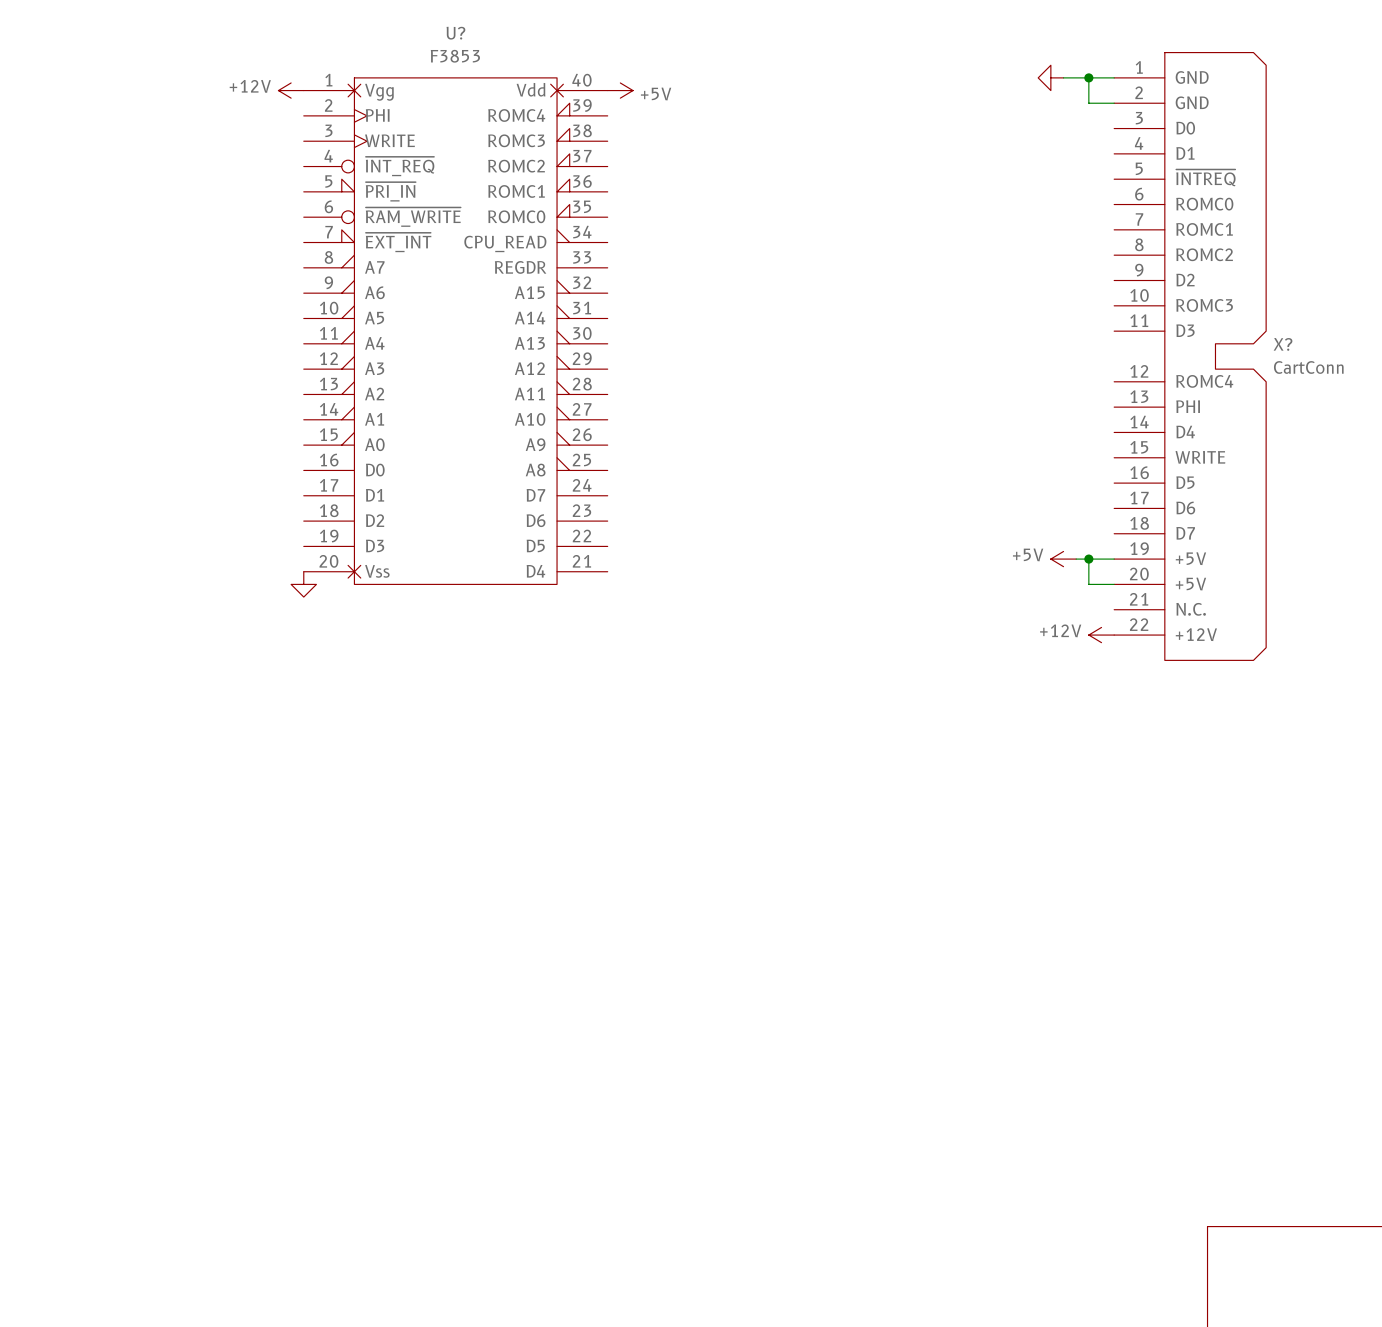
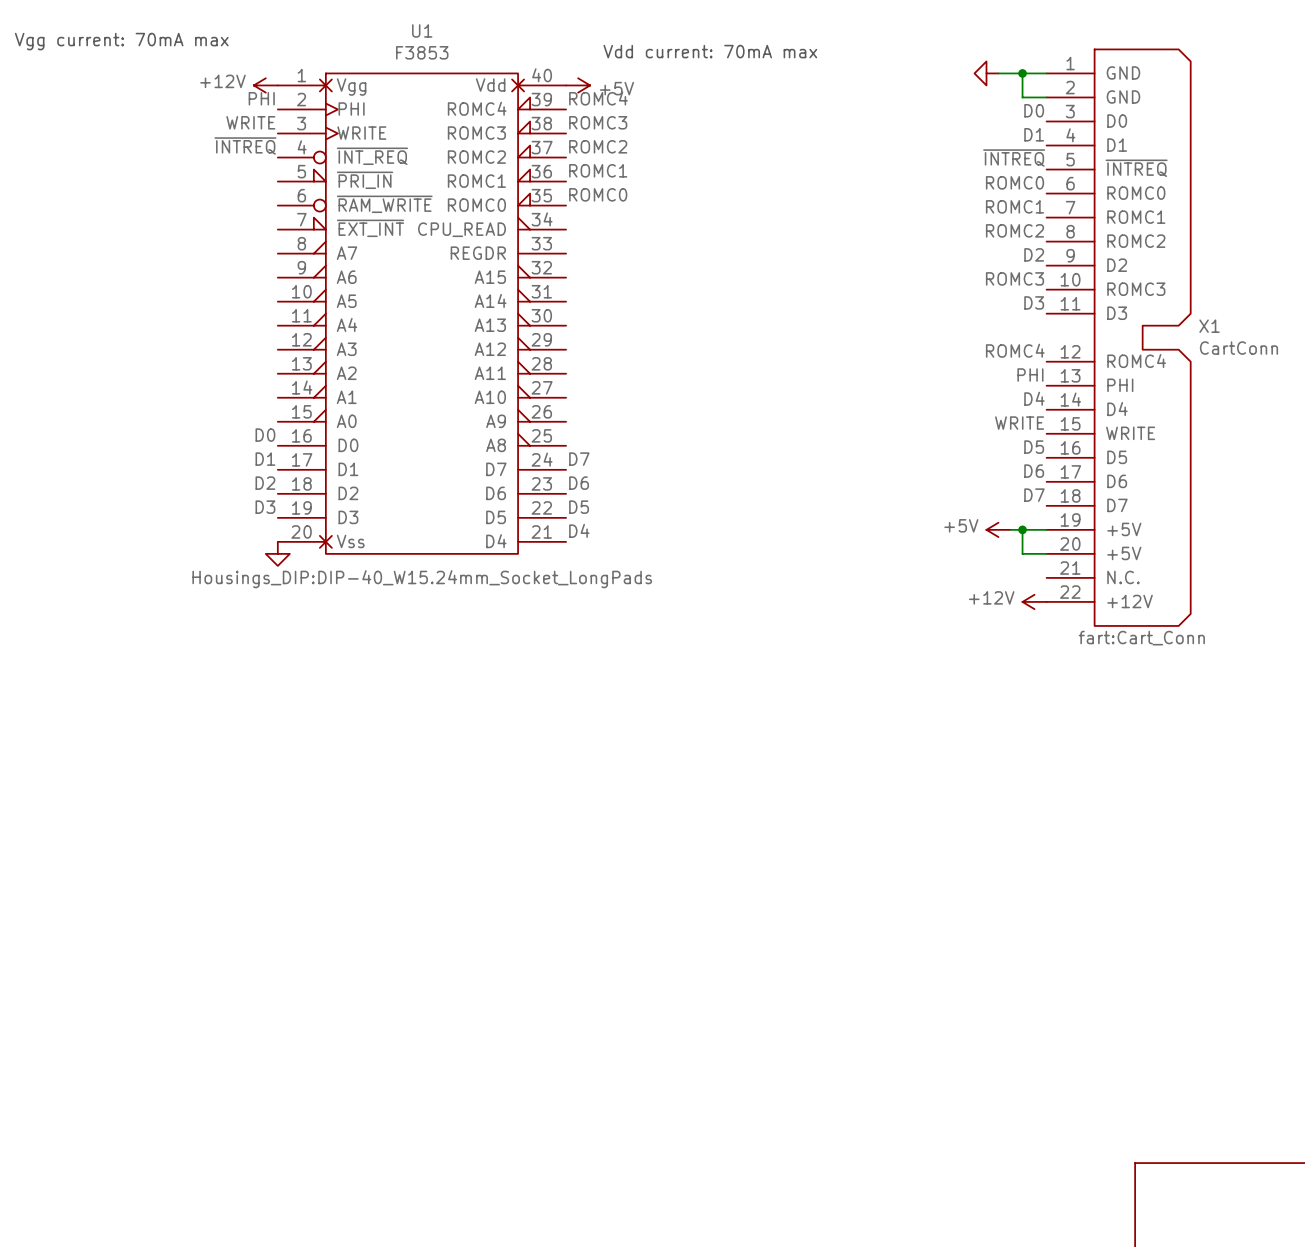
U? name: U? (455, 33) -> U1 (422, 30)
text: none -> Vgg current: 70mA max (121, 41)
text: none -> Vdd current: 70mA max (710, 51)
label: none -> PHI (261, 98)
label: none -> ROMC4 (598, 98)
label: none -> D0 (1034, 110)
label: none -> WRITE (250, 122)
label: none -> ROMC3 (598, 122)
label: none -> D1 (1034, 134)
label: none -> ~{INTREQ} (245, 145)
label: none -> ROMC2 (598, 146)
label: none -> ~{INTREQ} (1014, 158)
label: none -> ROMC1 (598, 170)
label: none -> ROMC0 (1015, 182)
label: none -> ROMC0 (598, 194)
label: none -> ROMC1 (1015, 206)
label: none -> ROMC2 (1015, 230)
label: none -> D2 (1034, 254)
label: none -> ROMC3 (1015, 278)
label: none -> D3 (1034, 302)
X? name: X? (1283, 344) -> X1 (1209, 326)
label: none -> ROMC4 (1015, 350)
label: none -> PHI (1030, 375)
label: none -> D4 (1034, 398)
label: none -> WRITE (1019, 423)
label: none -> D0 (265, 435)
label: none -> D5 (1034, 447)
label: none -> D1 (265, 459)
label: none -> D7 (579, 459)
label: none -> D6 (1034, 471)
label: none -> D2 (265, 483)
label: none -> D6 (579, 483)
label: none -> D7 (1034, 495)
label: none -> D3 (265, 507)
label: none -> D5 (579, 507)
label: none -> D4 (579, 530)
U? text: none -> Housings_DIP:DIP-40_W15.24mm_Socket_LongPads (422, 579)
X? text: none -> fart:Cart_Conn (1141, 638)

